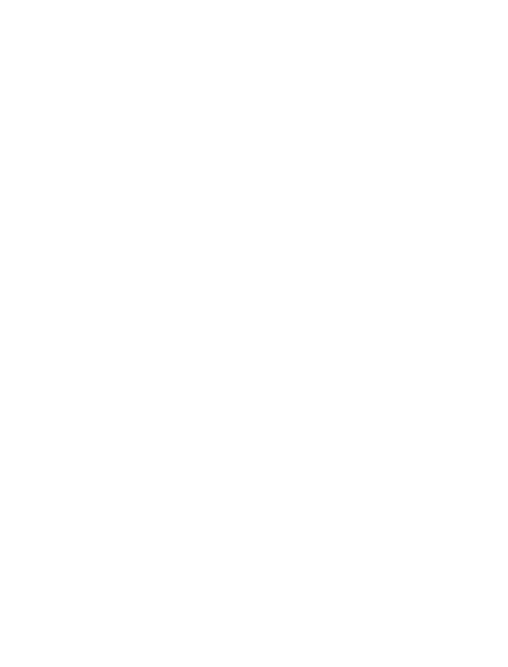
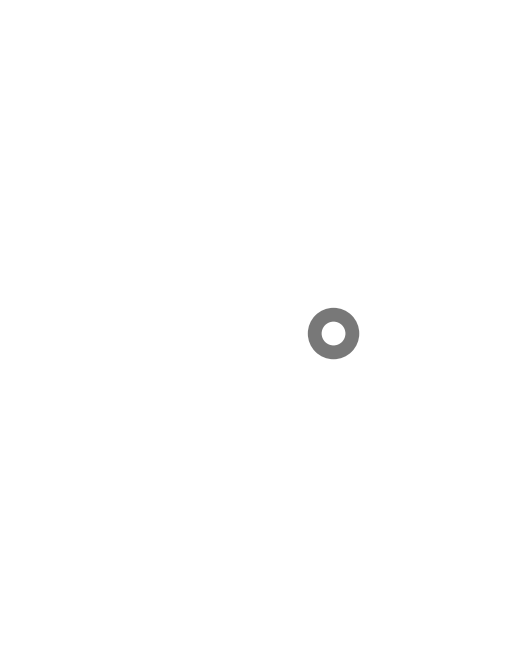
via: none -> (333, 333)

